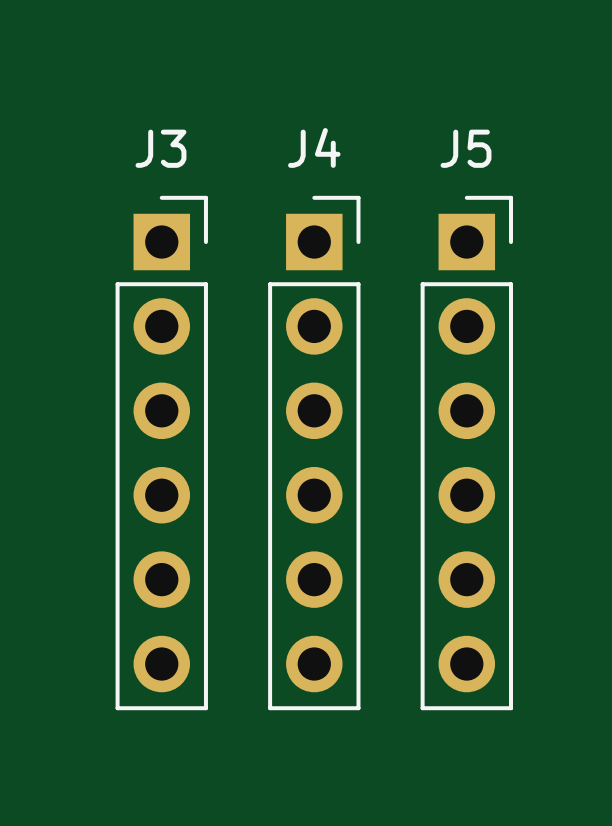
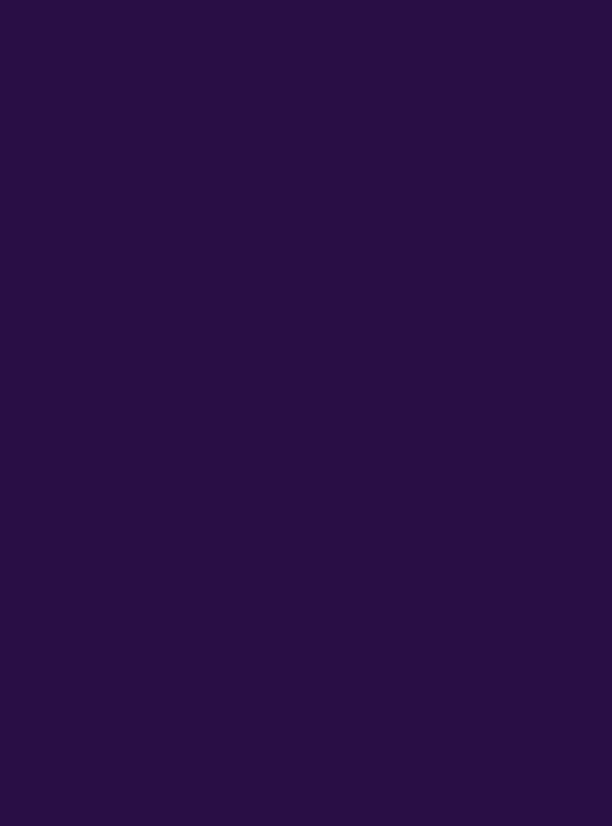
J3: (161, 453) -> none
J4: (314, 453) -> none
J5: (466, 453) -> none

